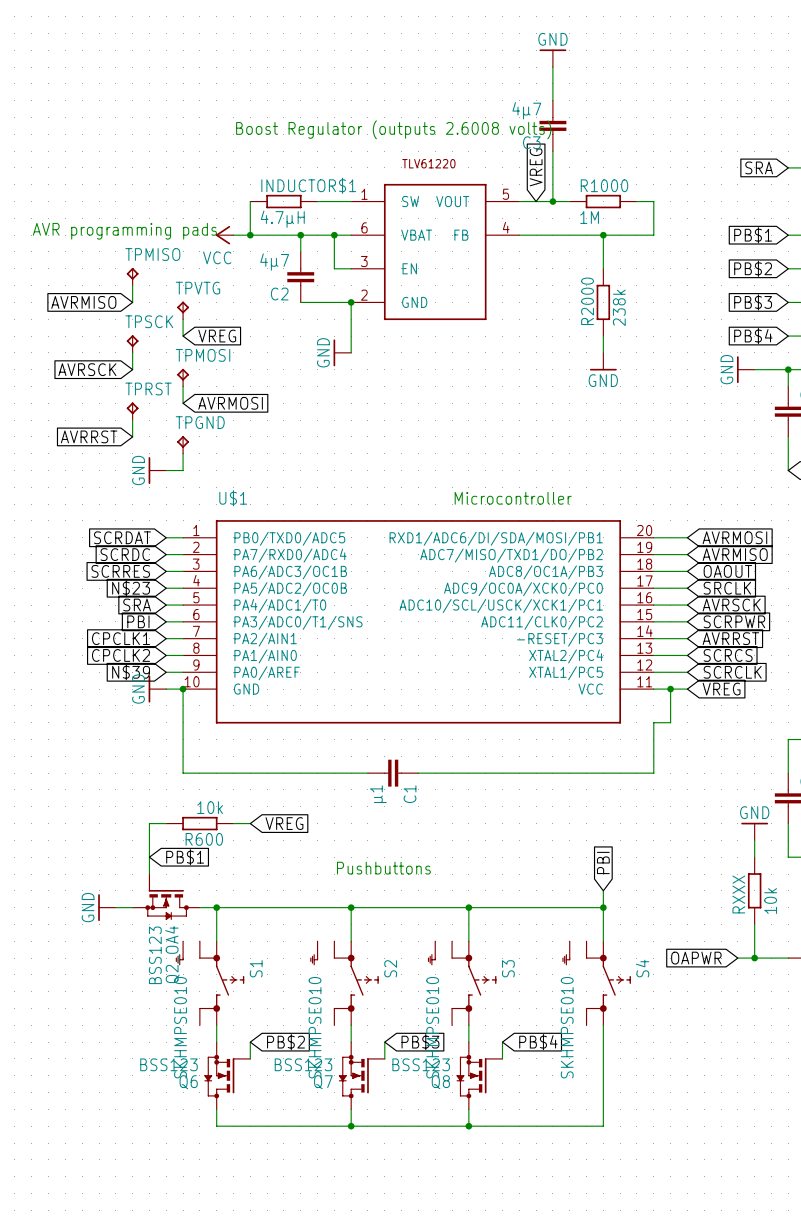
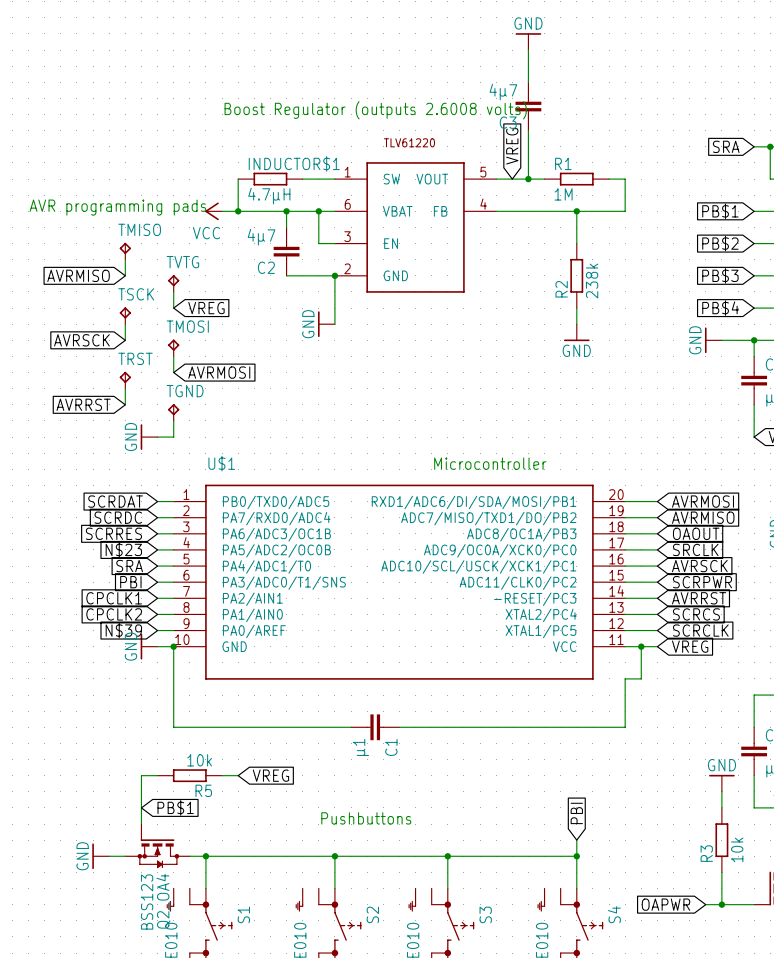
R1000 name: R1000 (604, 185) -> R1 (563, 163)
TPMISO name: TPMISO (152, 254) -> TMISO (139, 229)
TPVTG name: TPVTG (197, 288) -> TVTG (182, 262)
R2000 name: R2000 (587, 301) -> R2 (561, 289)
TPSCK name: TPSCK (149, 321) -> TSCK (136, 294)
TPMOSI name: TPMOSI (203, 355) -> TMOSI (187, 326)
TPRST name: TPRST (148, 389) -> TRST (135, 358)
TPGND name: TPGND (200, 422) -> TGND (185, 391)
R600 name: R600 (204, 839) -> R5 (203, 790)
RXXX name: RXXX (738, 894) -> R3 (706, 853)

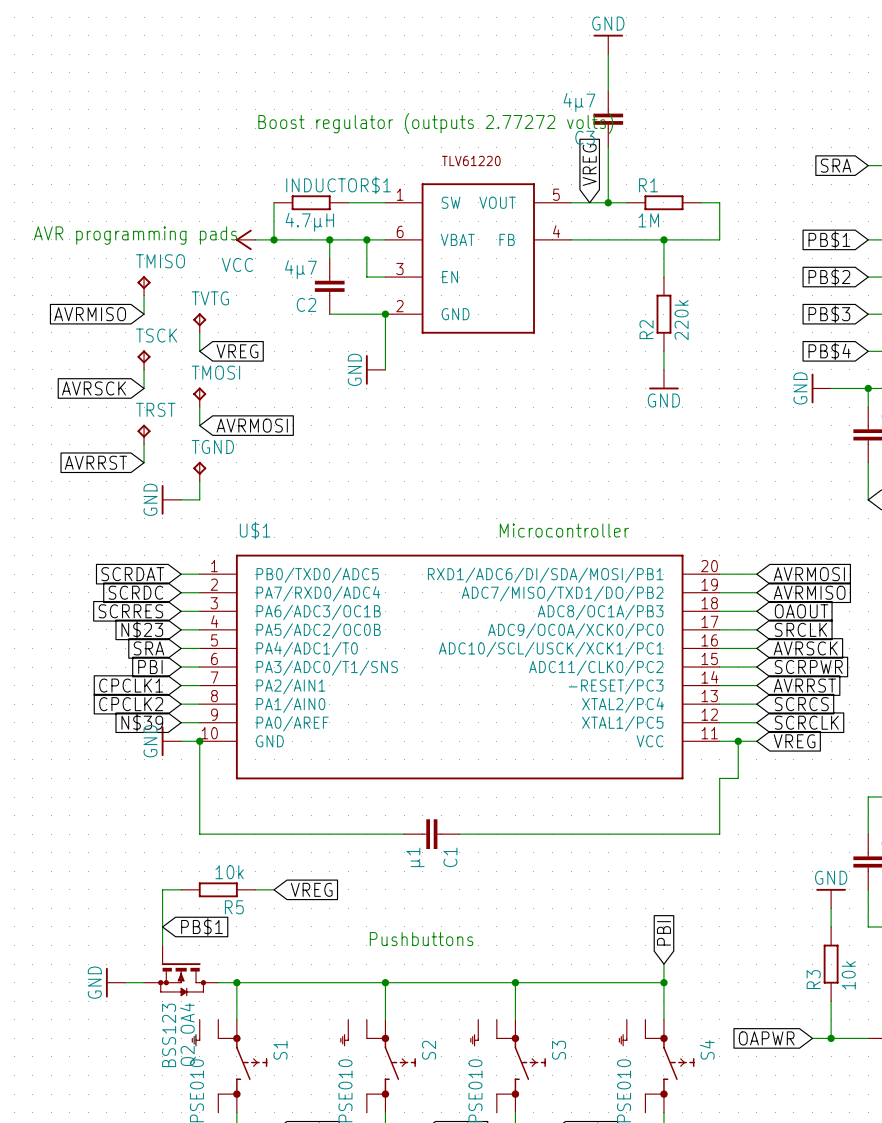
text: Boost Regulator (outputs 2.6008 volts) (375, 110) -> Boost regulator (outputs 2.77272 volts) (435, 123)
R2 value: 238k (592, 281) -> 220k (681, 320)

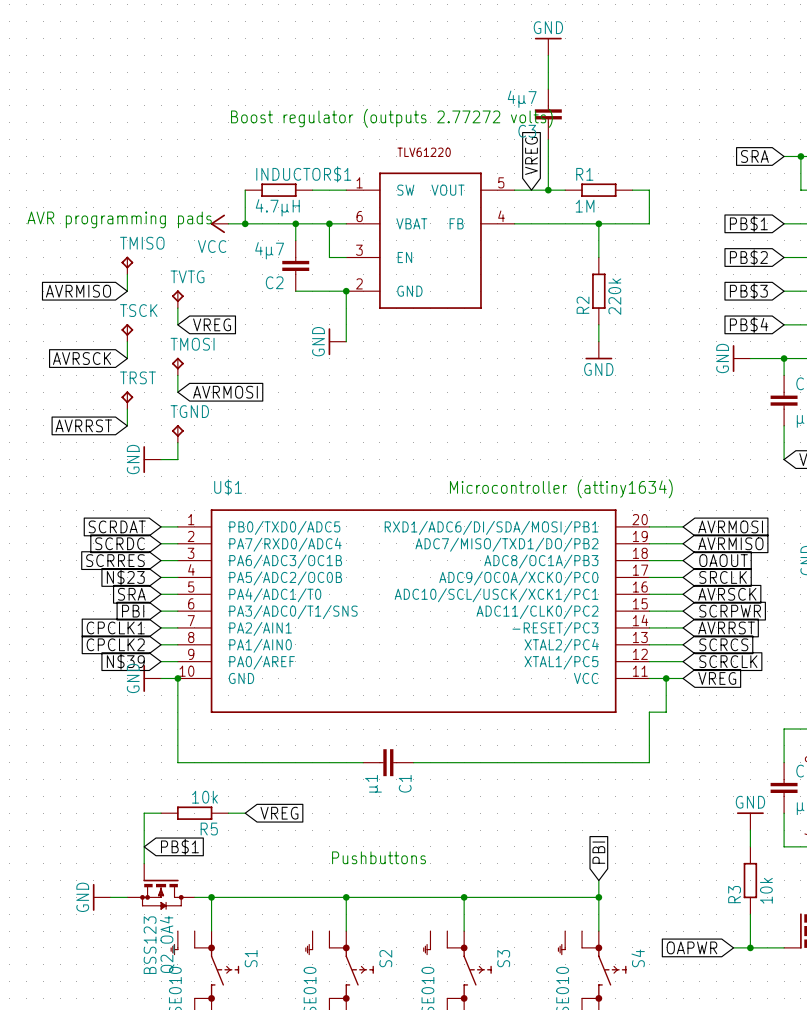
text: Microcontroller (564, 530) -> Microcontroller (attiny1634) (561, 488)

